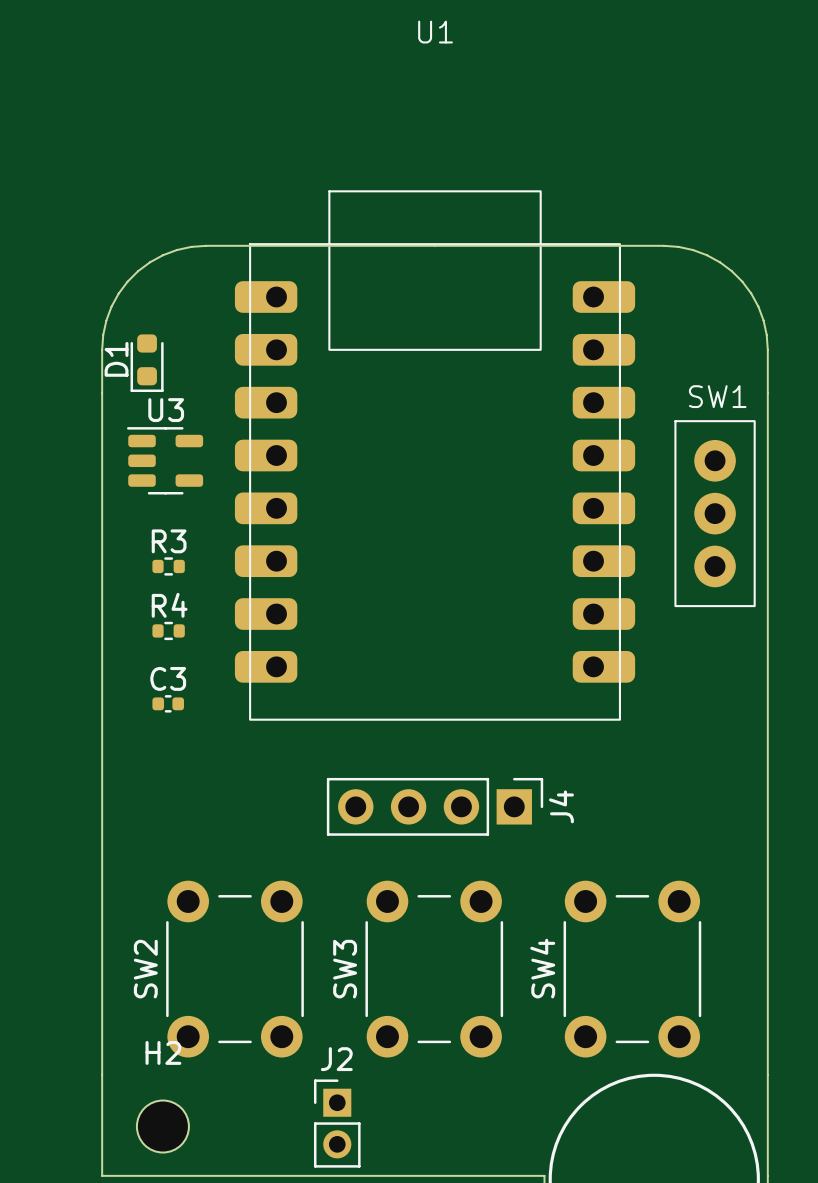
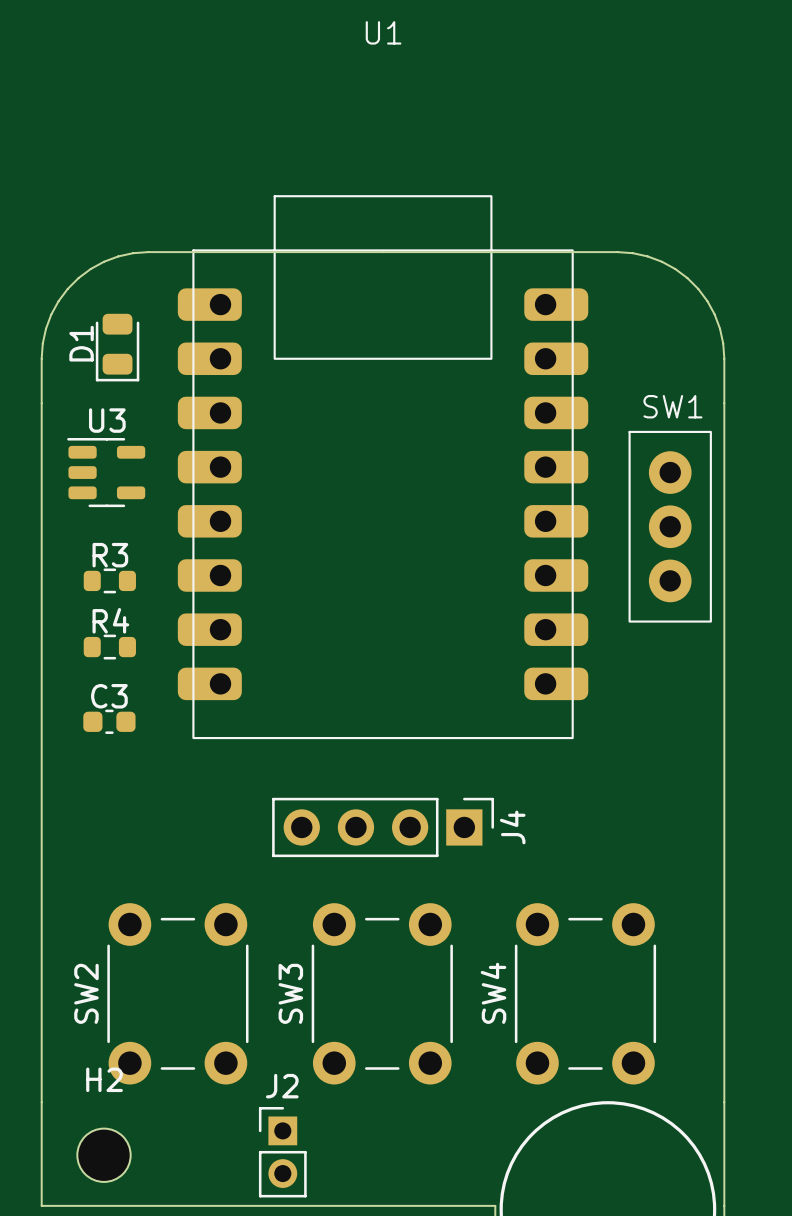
D1 footprint: [130, 334, 164, 393] -> [95, 313, 140, 382]
R3 footprint: [152, 557, 185, 576] -> [83, 568, 136, 594]
R4 footprint: [152, 621, 185, 641] -> [83, 634, 136, 660]
C3 footprint: [152, 695, 185, 713] -> [83, 709, 136, 734]

